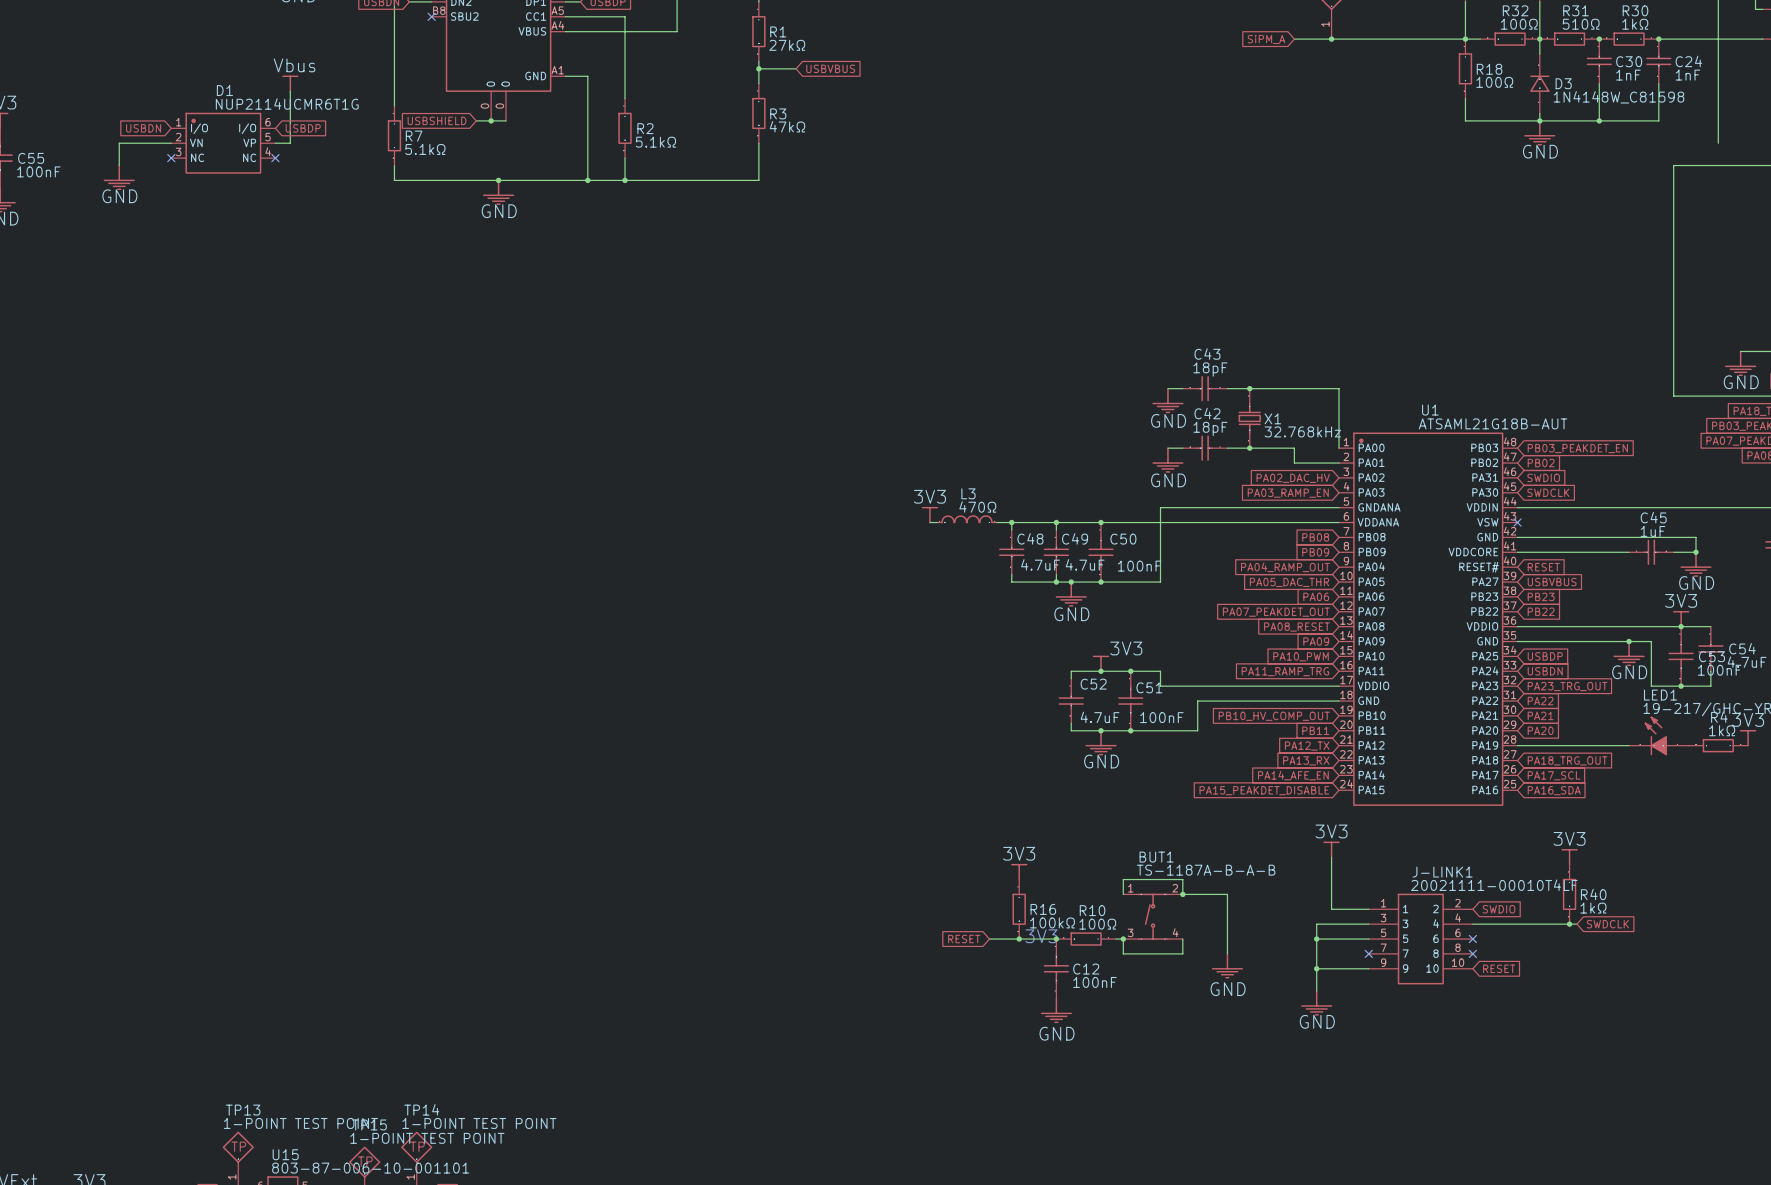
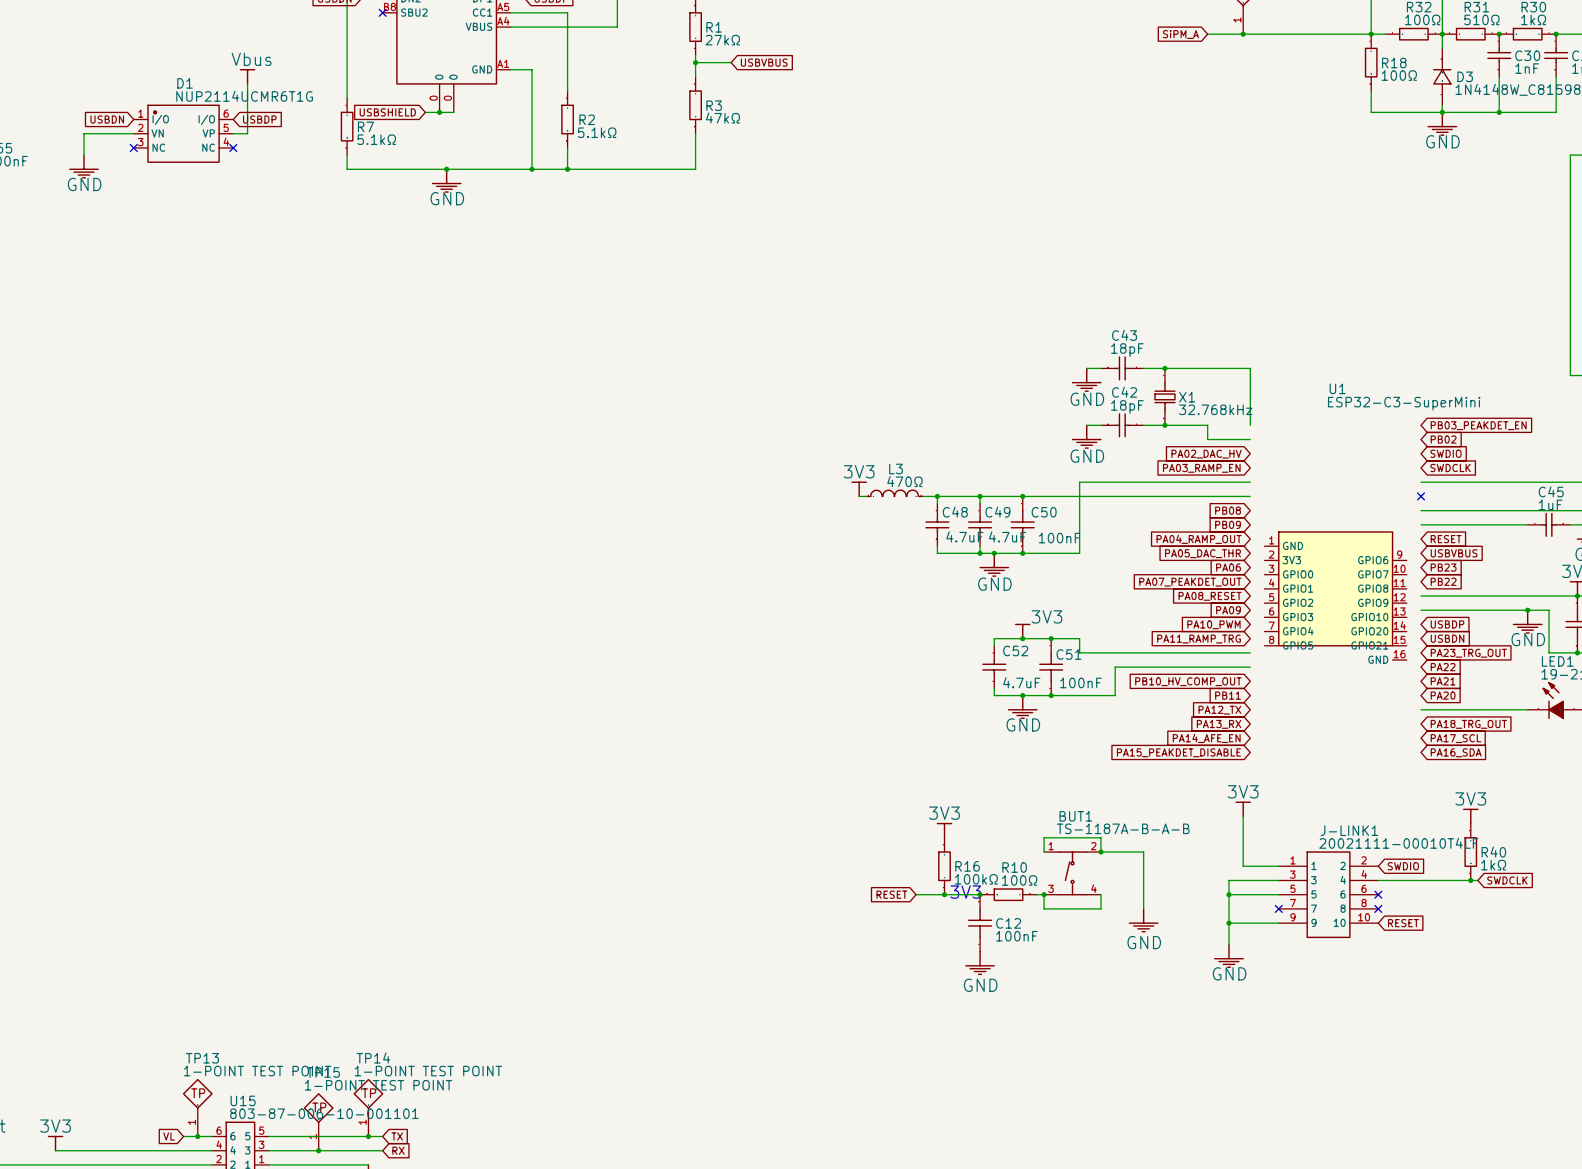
U1 value: ATSAML21G18B-AUT (1493, 423) -> ESP32-C3-SuperMini (1404, 403)
U1 symbol: [1339, 432, 1518, 806] -> [1264, 531, 1407, 661]

